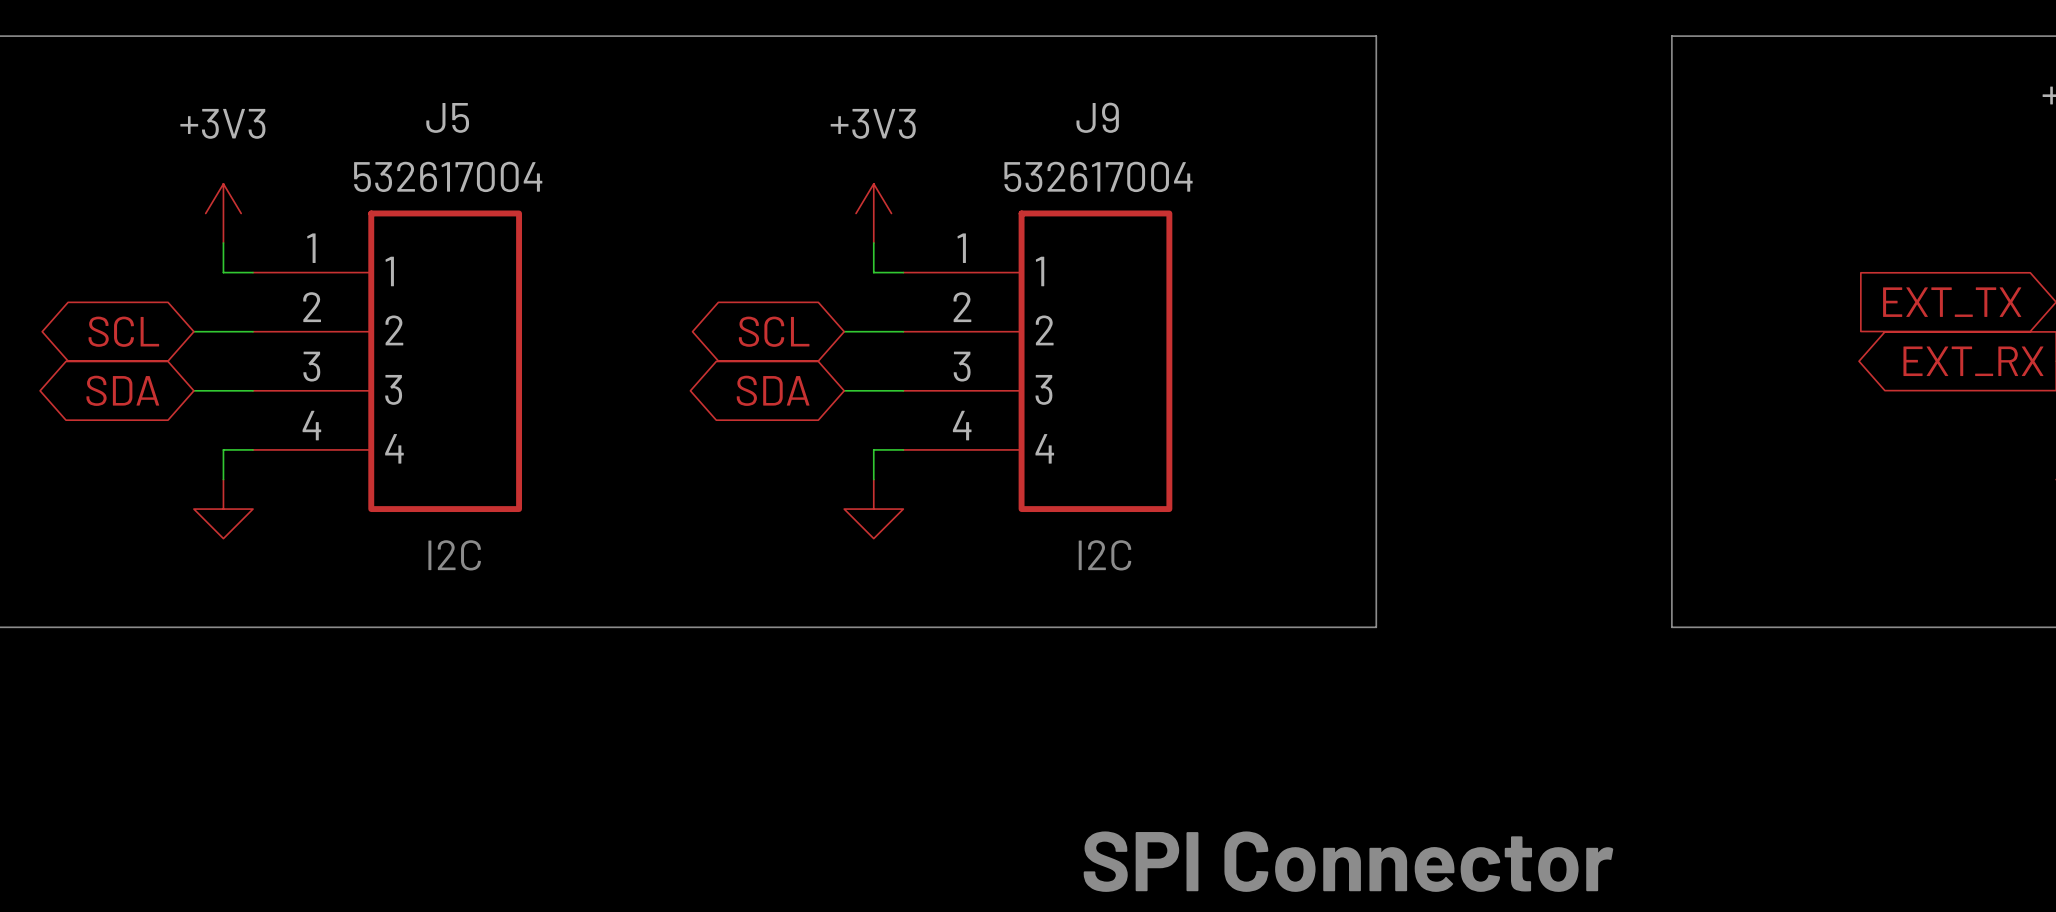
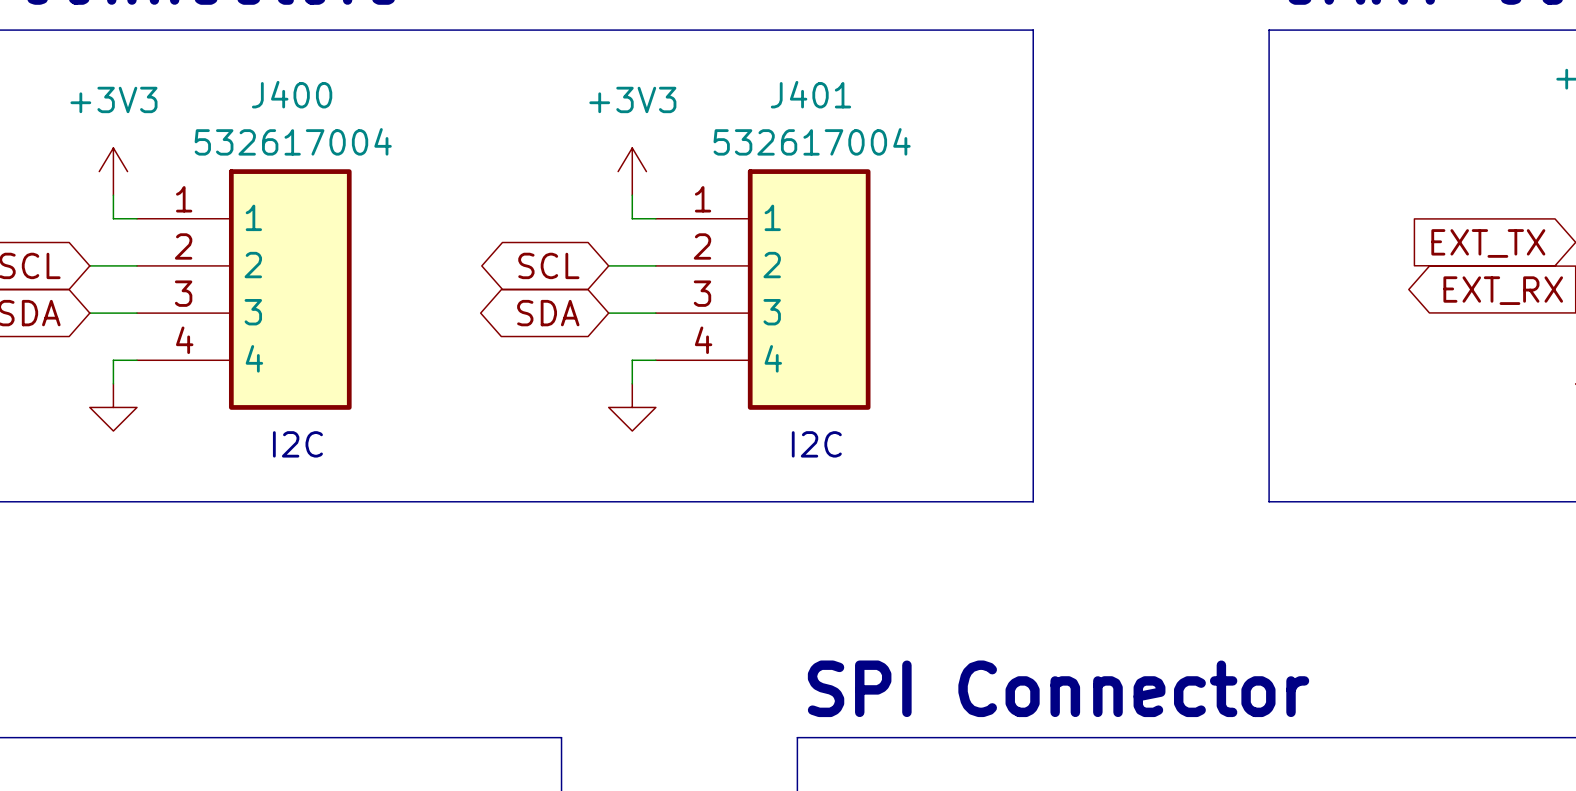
J5 name: J5 (447, 117) -> J400 (292, 94)
J9 name: J9 (1097, 117) -> J401 (810, 94)

